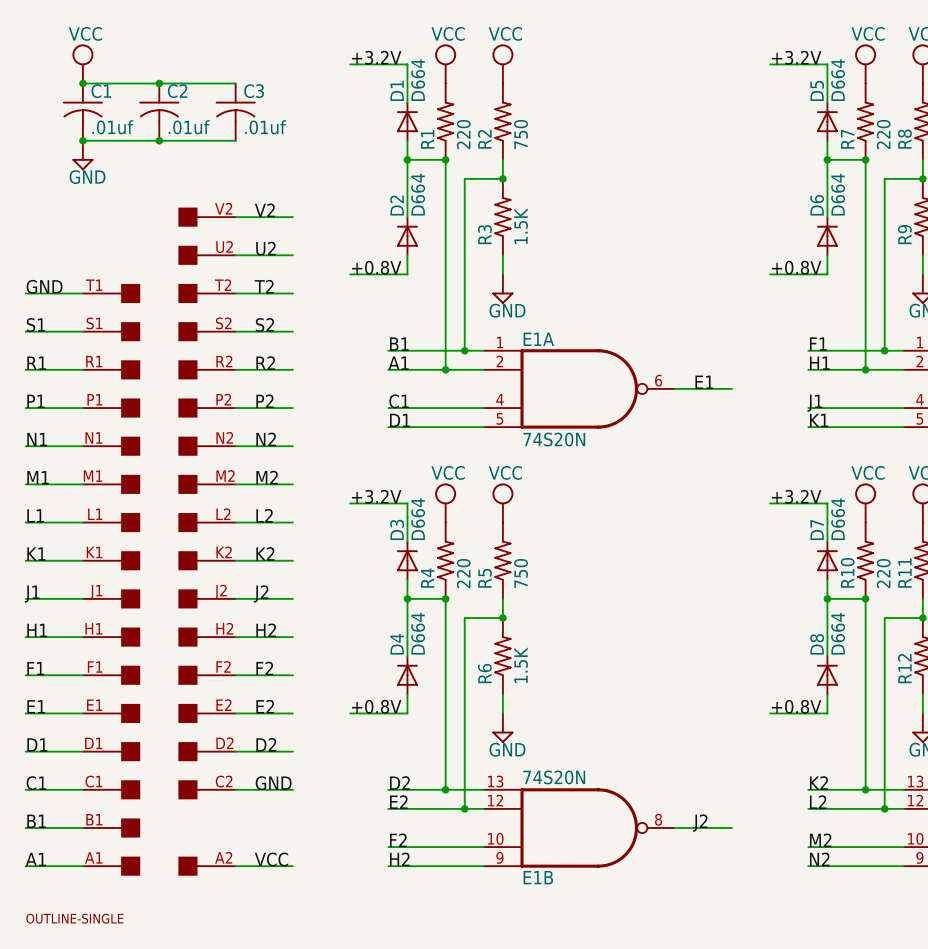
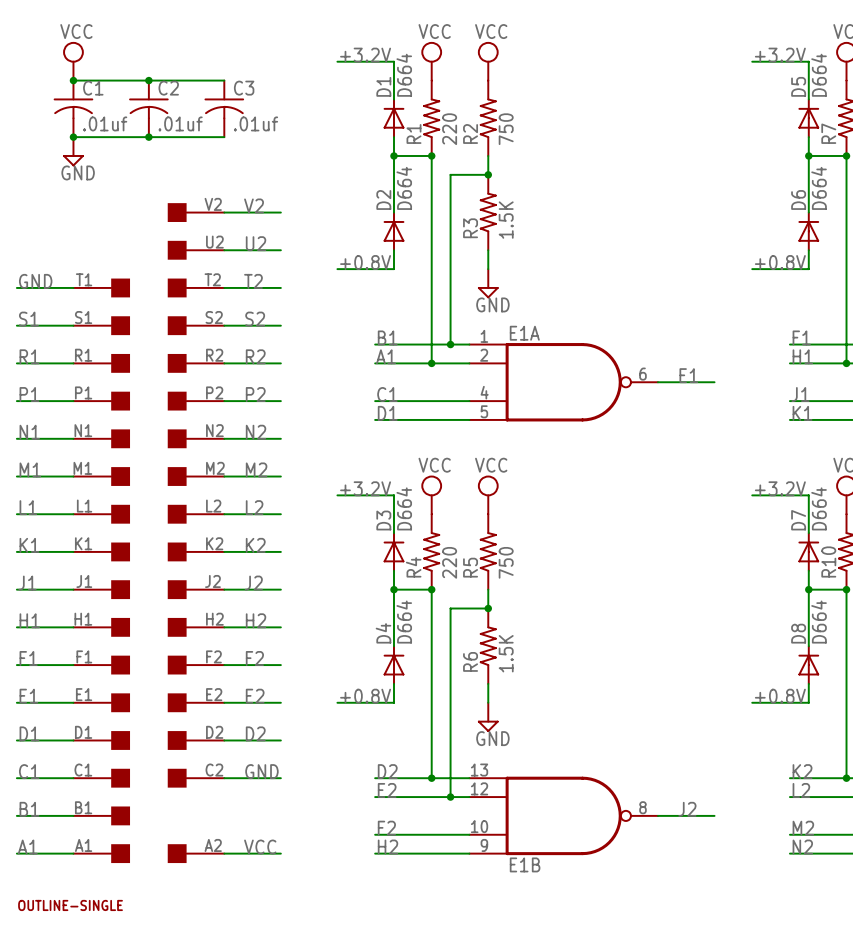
E1A value: 74S20N (554, 439) -> none
E1B value: 74S20N (554, 777) -> none

